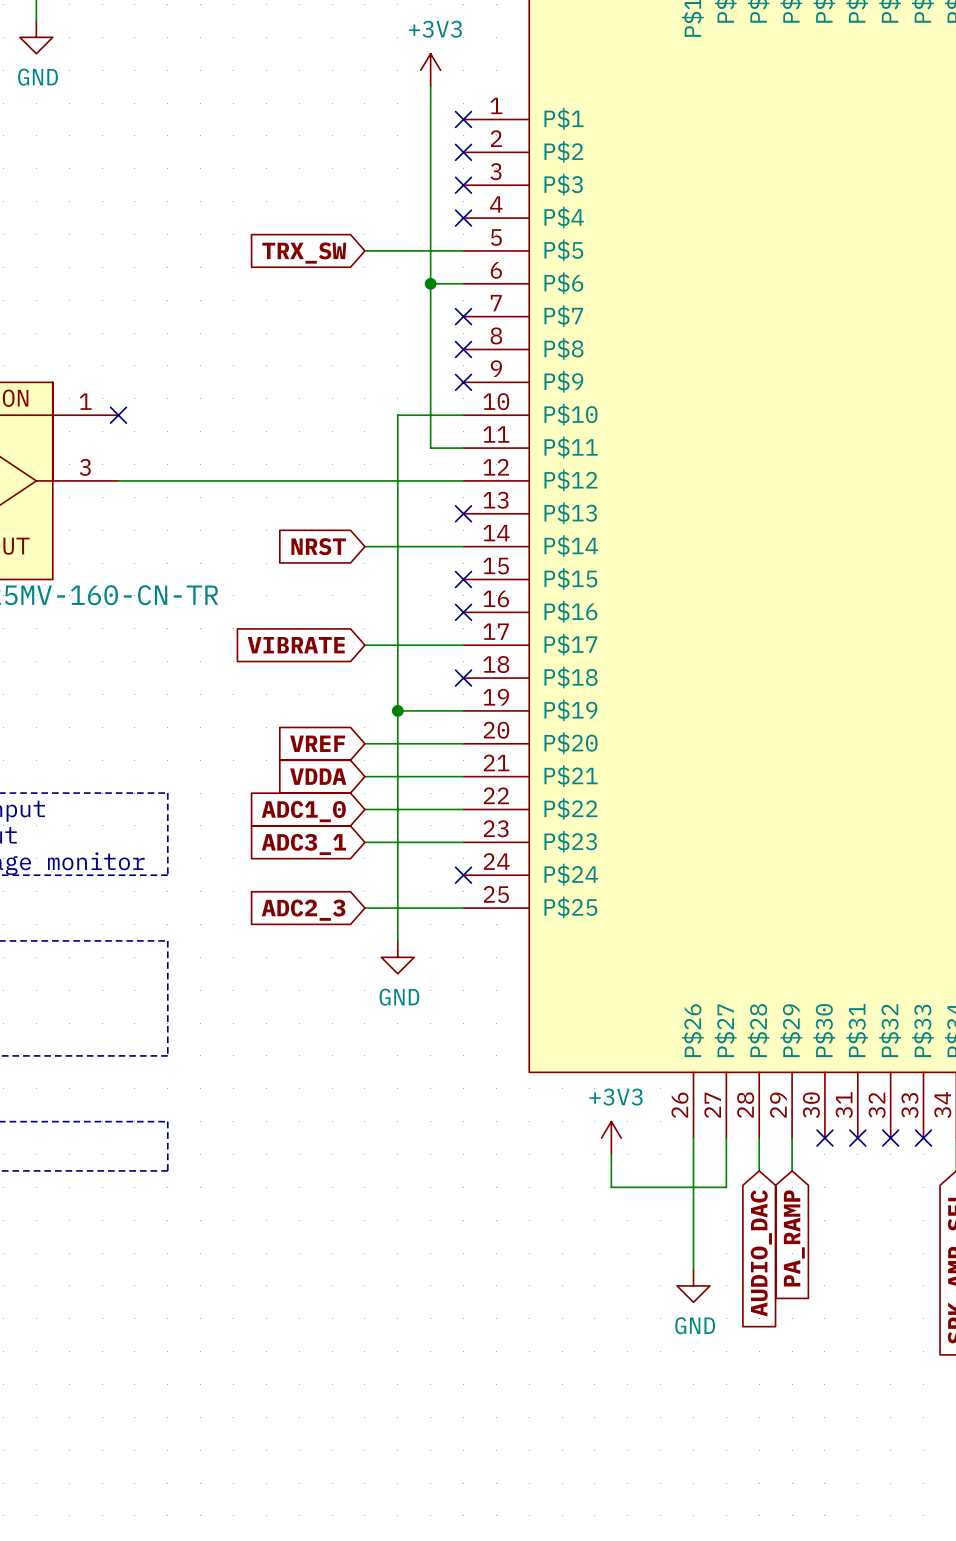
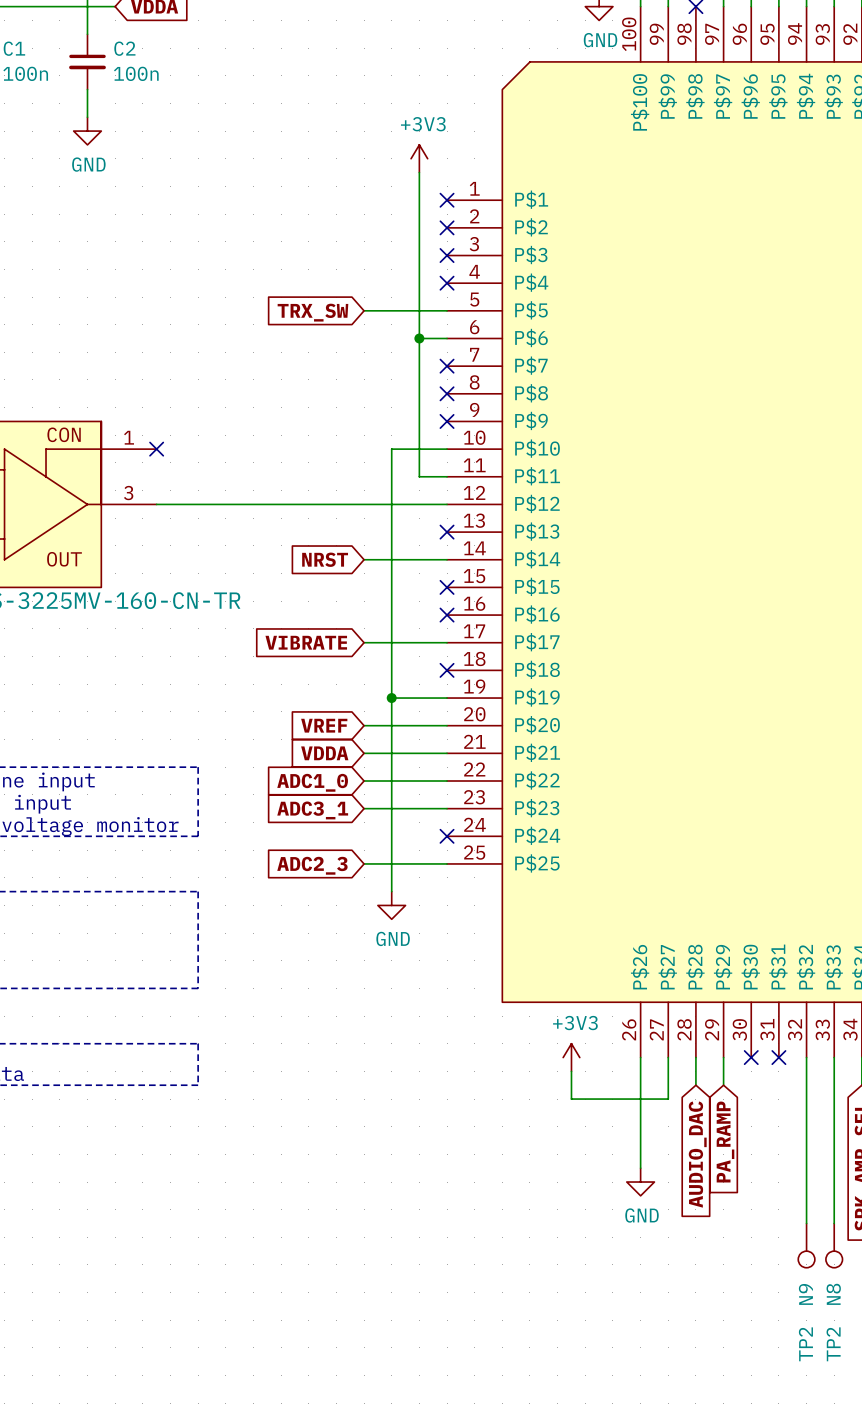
wire: none -> (806, 1057) (806, 1223)
no-connect mark: (890, 1138) -> none
wire: none -> (834, 1057) (834, 1223)
no-connect mark: (923, 1138) -> none
N9: none -> TP2 (806, 1245)
N8: none -> TP2 (834, 1245)

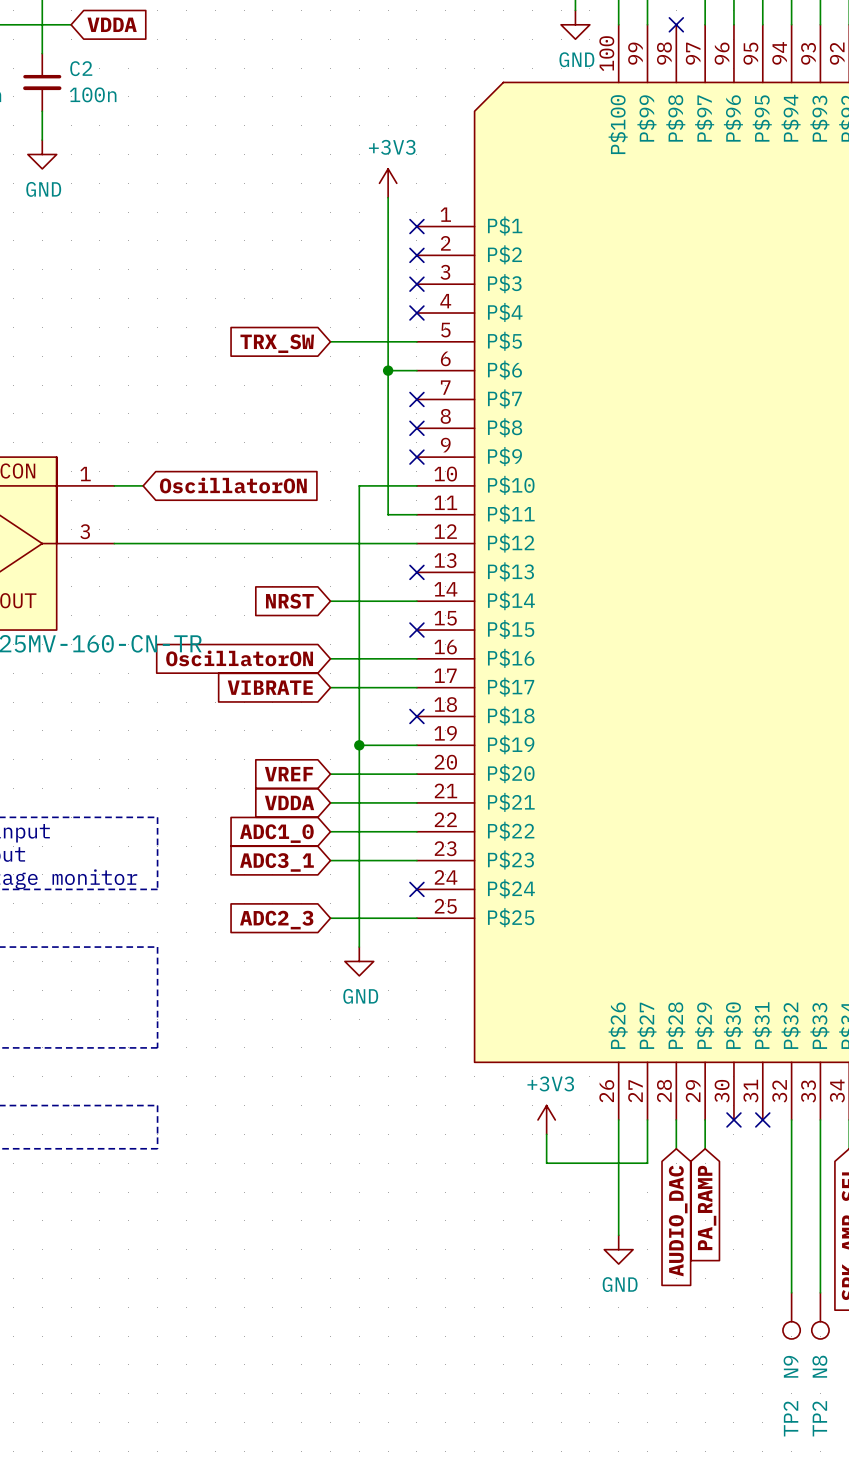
global label: none -> OscillatorON (233, 485)
wire: none -> (114, 485) (143, 485)
no-connect mark: (156, 449) -> none
global label: none -> OscillatorON (239, 658)
wire: none -> (330, 658) (416, 658)
no-connect mark: (447, 615) -> none

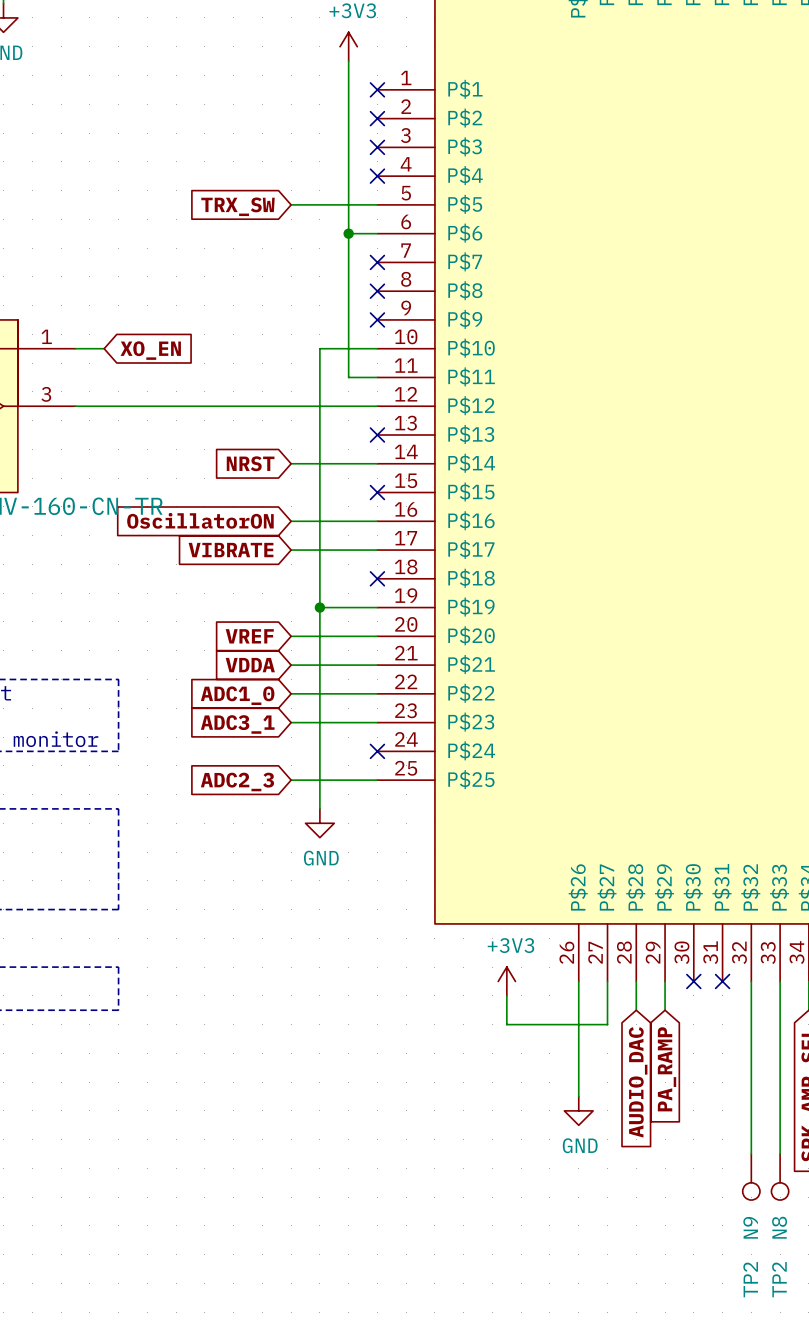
global label: OscillatorON (233, 485) -> XO_EN (150, 350)

